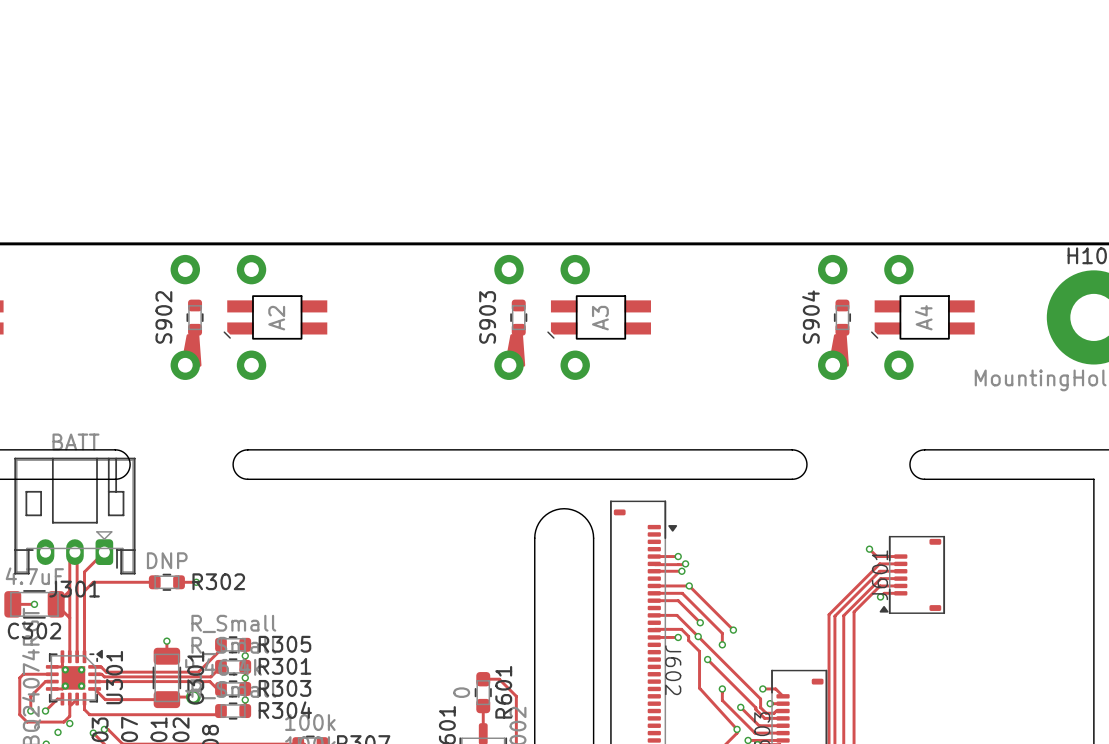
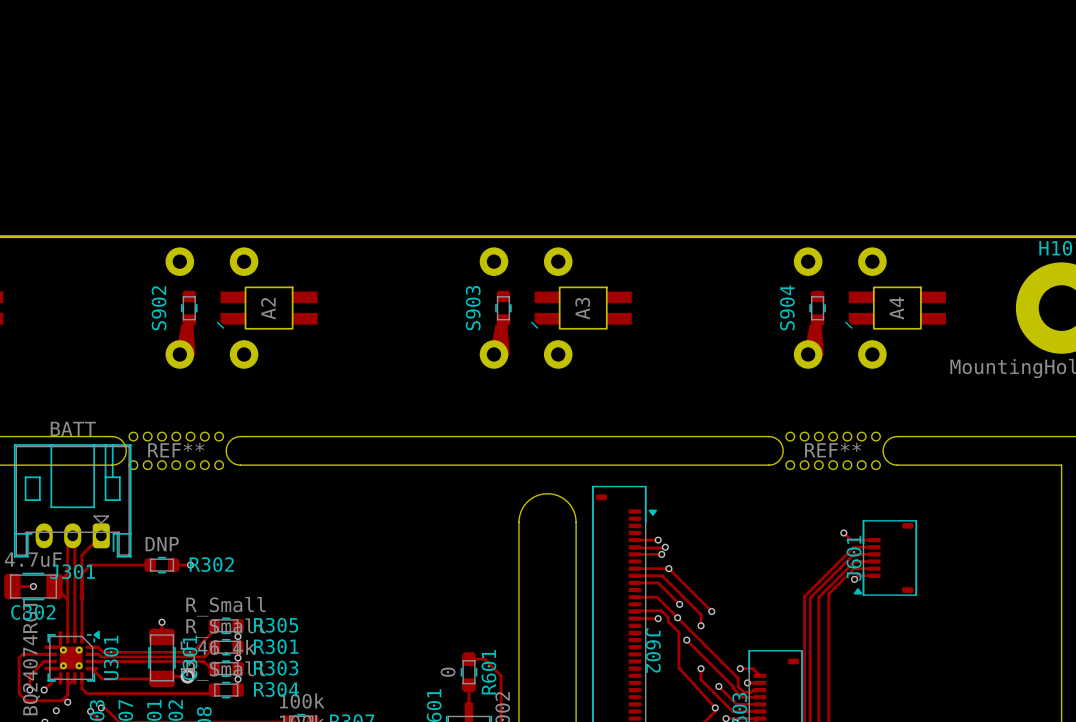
REF**: none -> (176, 450)
REF**: none -> (833, 450)

